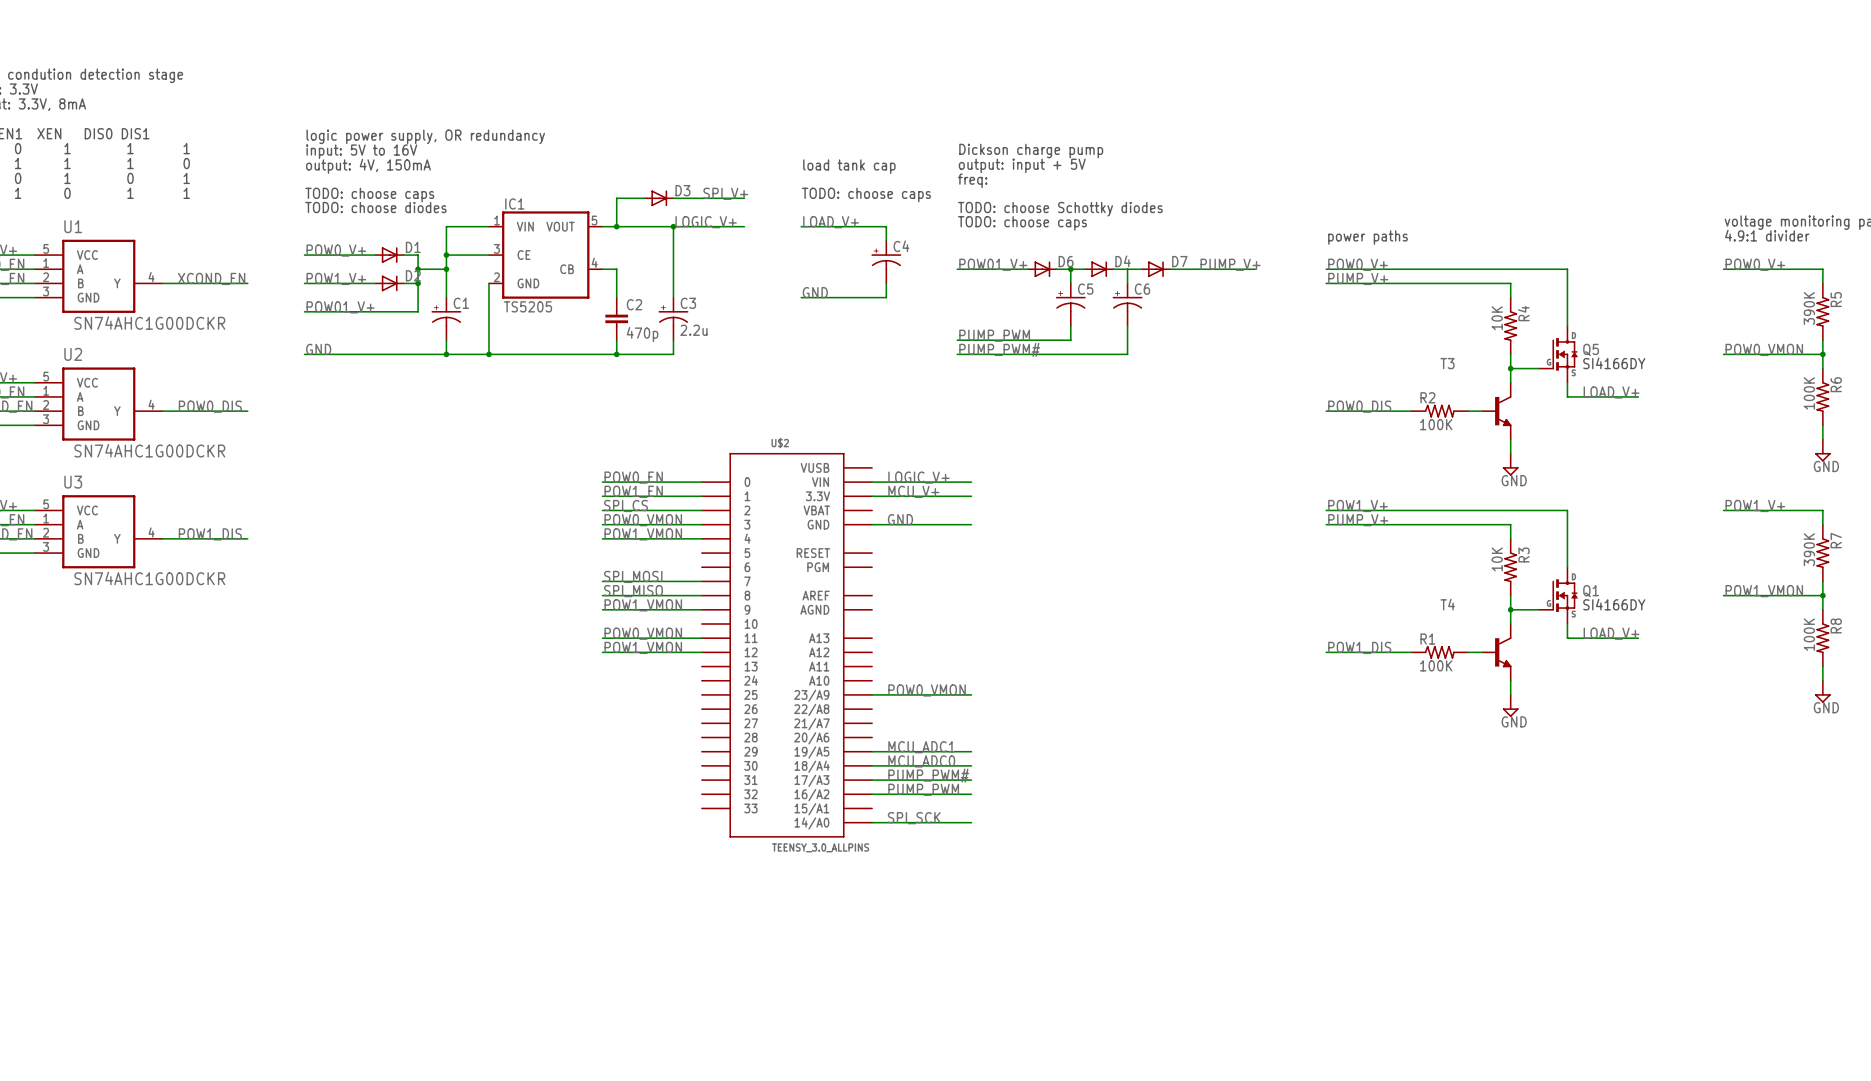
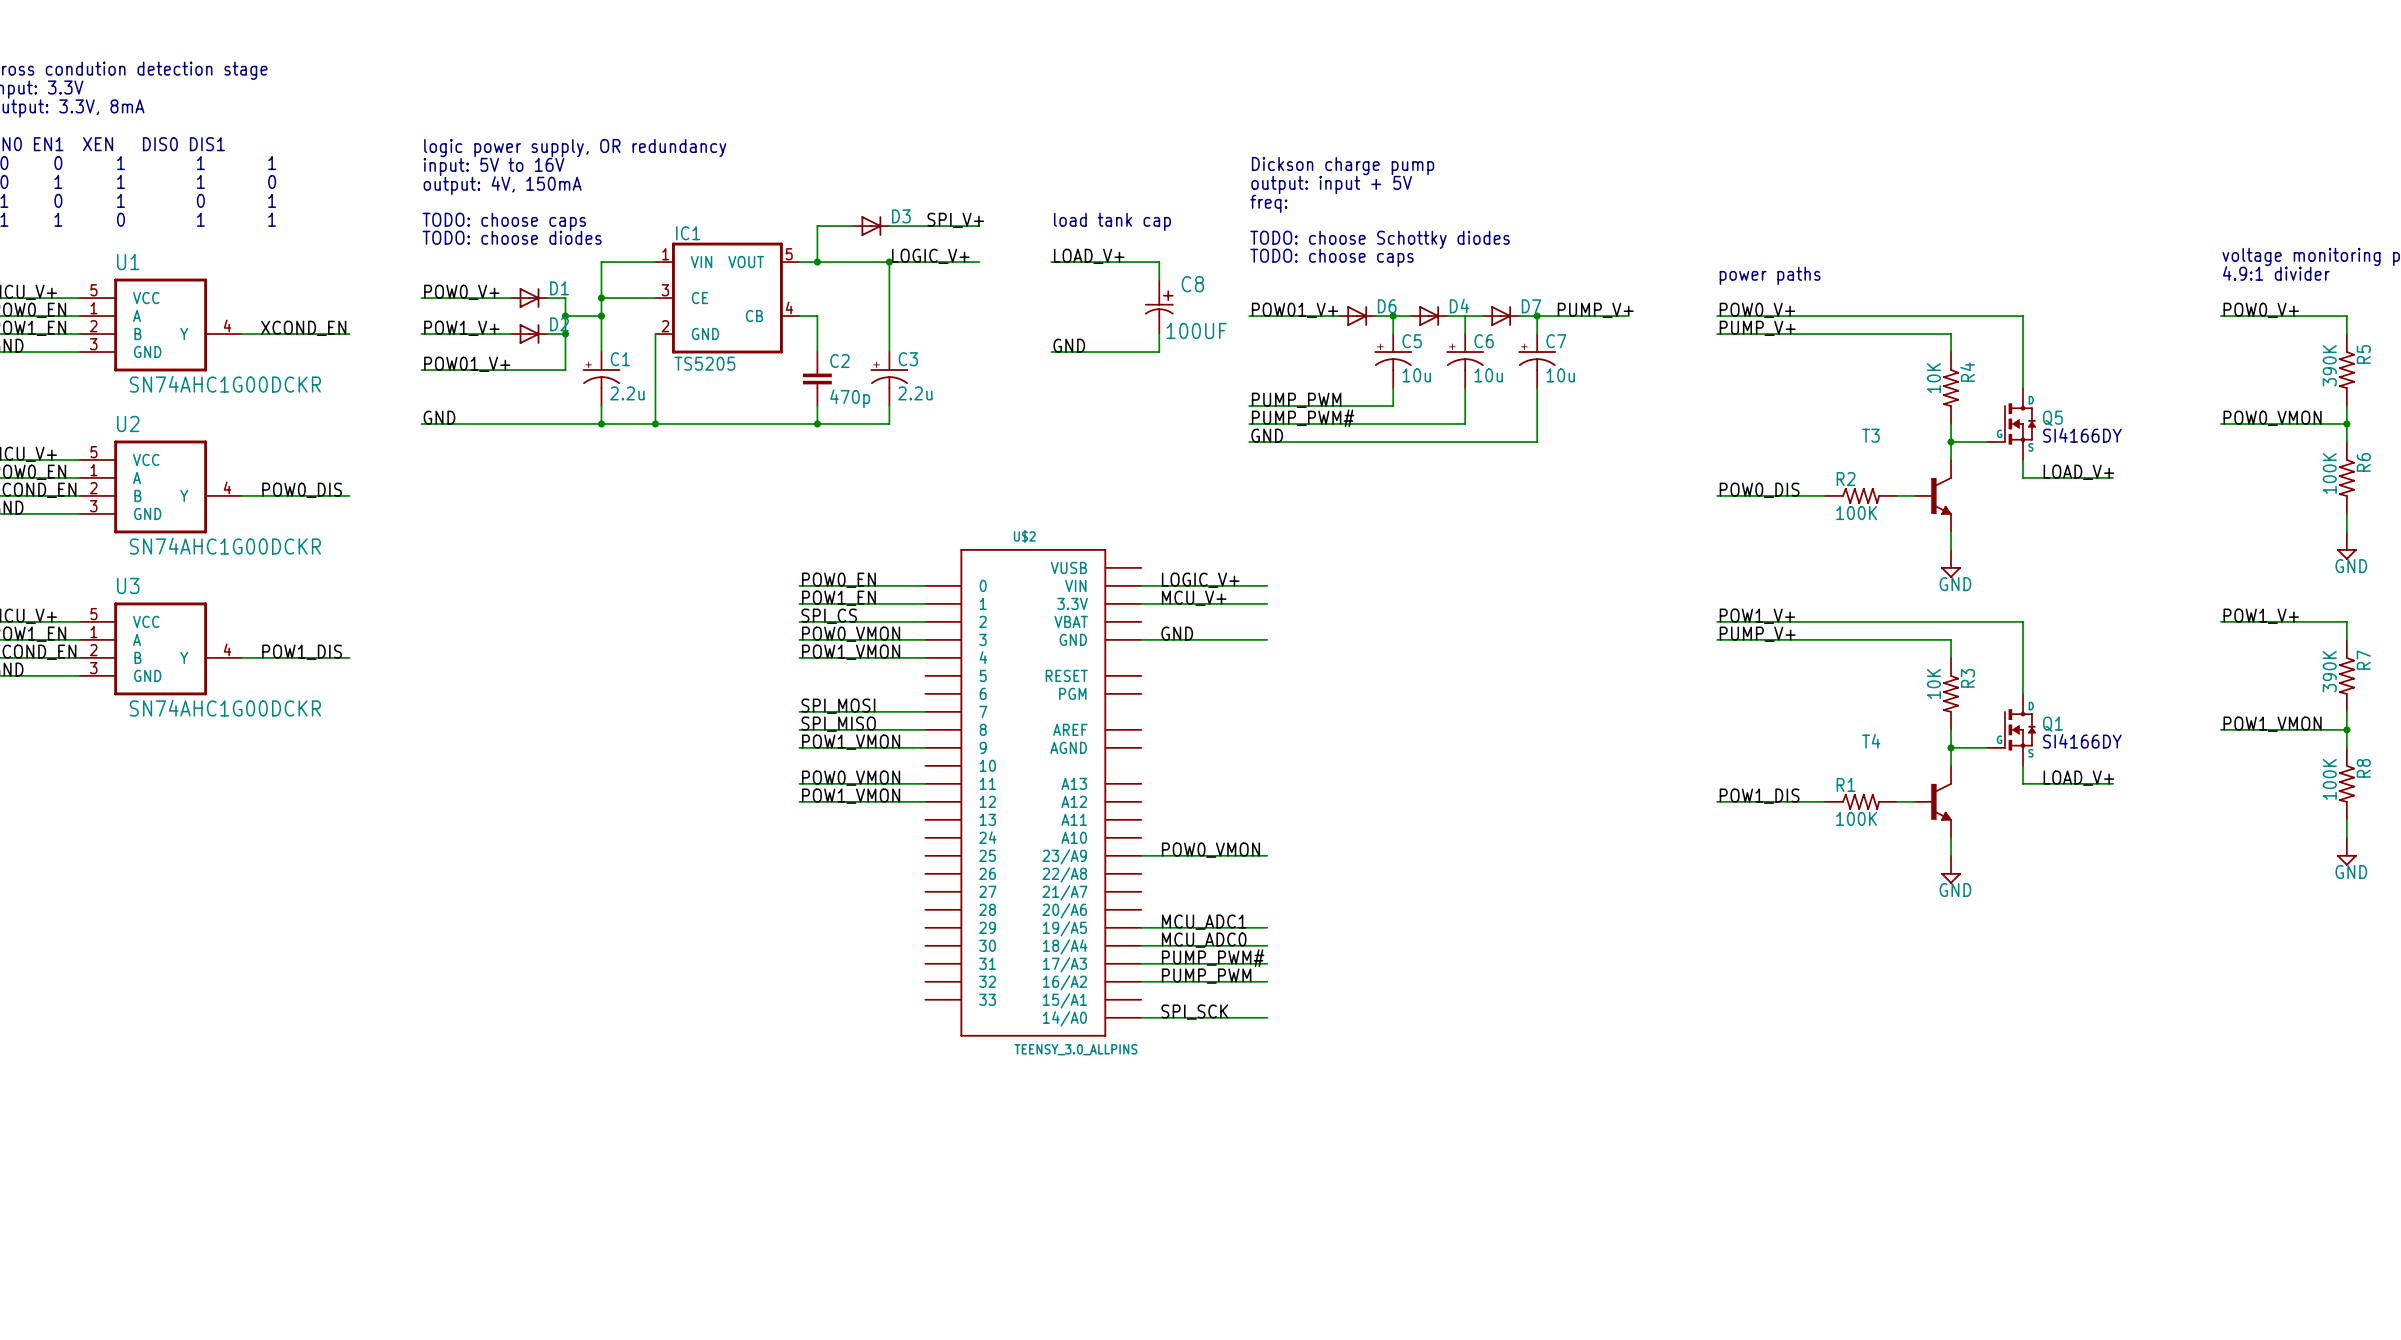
text: load tank cap (849, 166) -> none
text: TODO: choose caps (866, 194) -> load tank cap (1112, 221)
C4: (886, 262) -> none
C8: none -> 100UF (1159, 307)
wire: none -> (1537, 316) (1537, 334)
junction: none -> (1537, 316)
C7: none -> 10u (1537, 361)
C5 value: none -> 10u (1416, 375)
C6 value: none -> 10u (1488, 375)
wire: none -> (1537, 388) (1537, 441) (1249, 441)
C1 value: none -> 2.2u (627, 393)
label: none -> GND (1267, 435)

